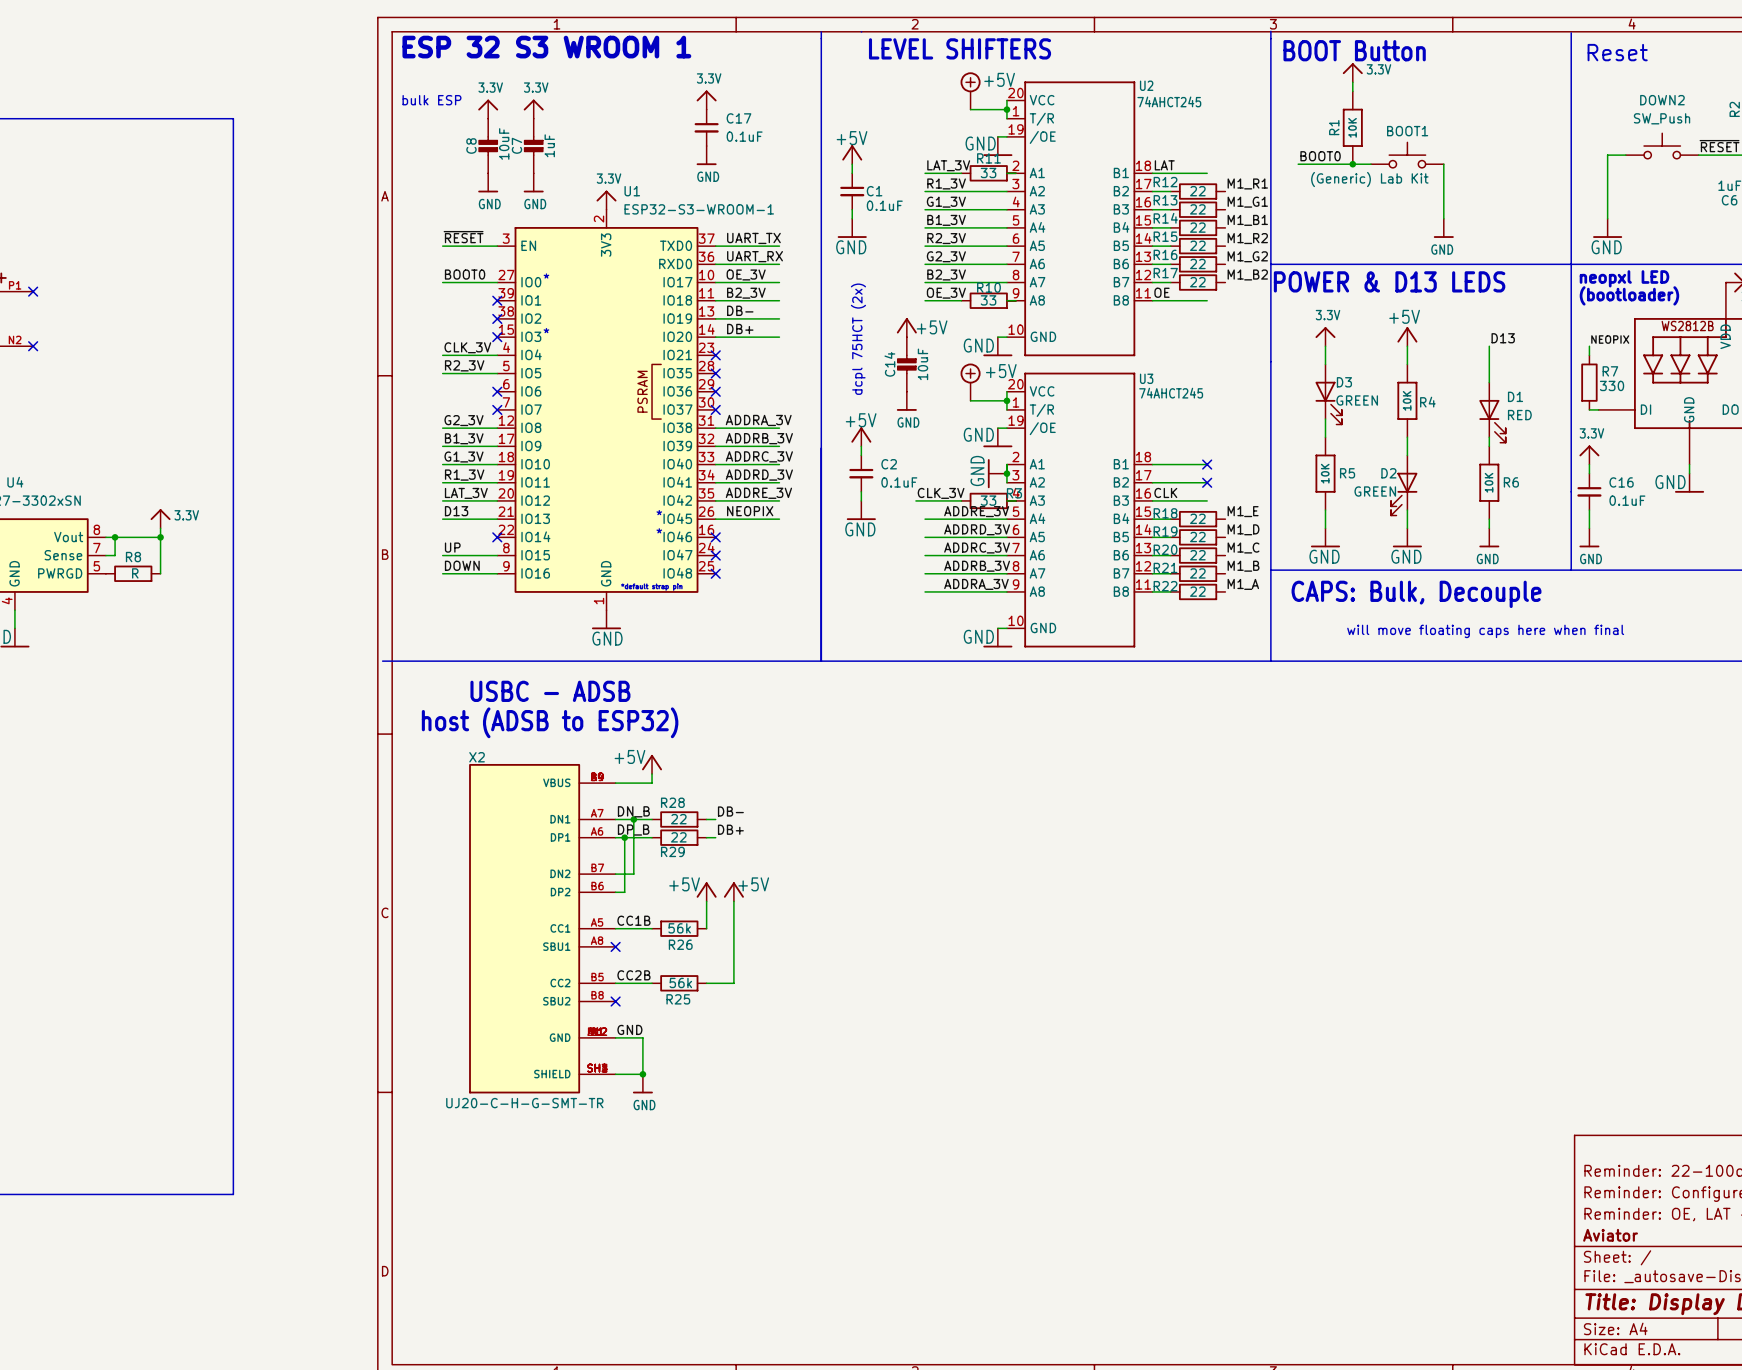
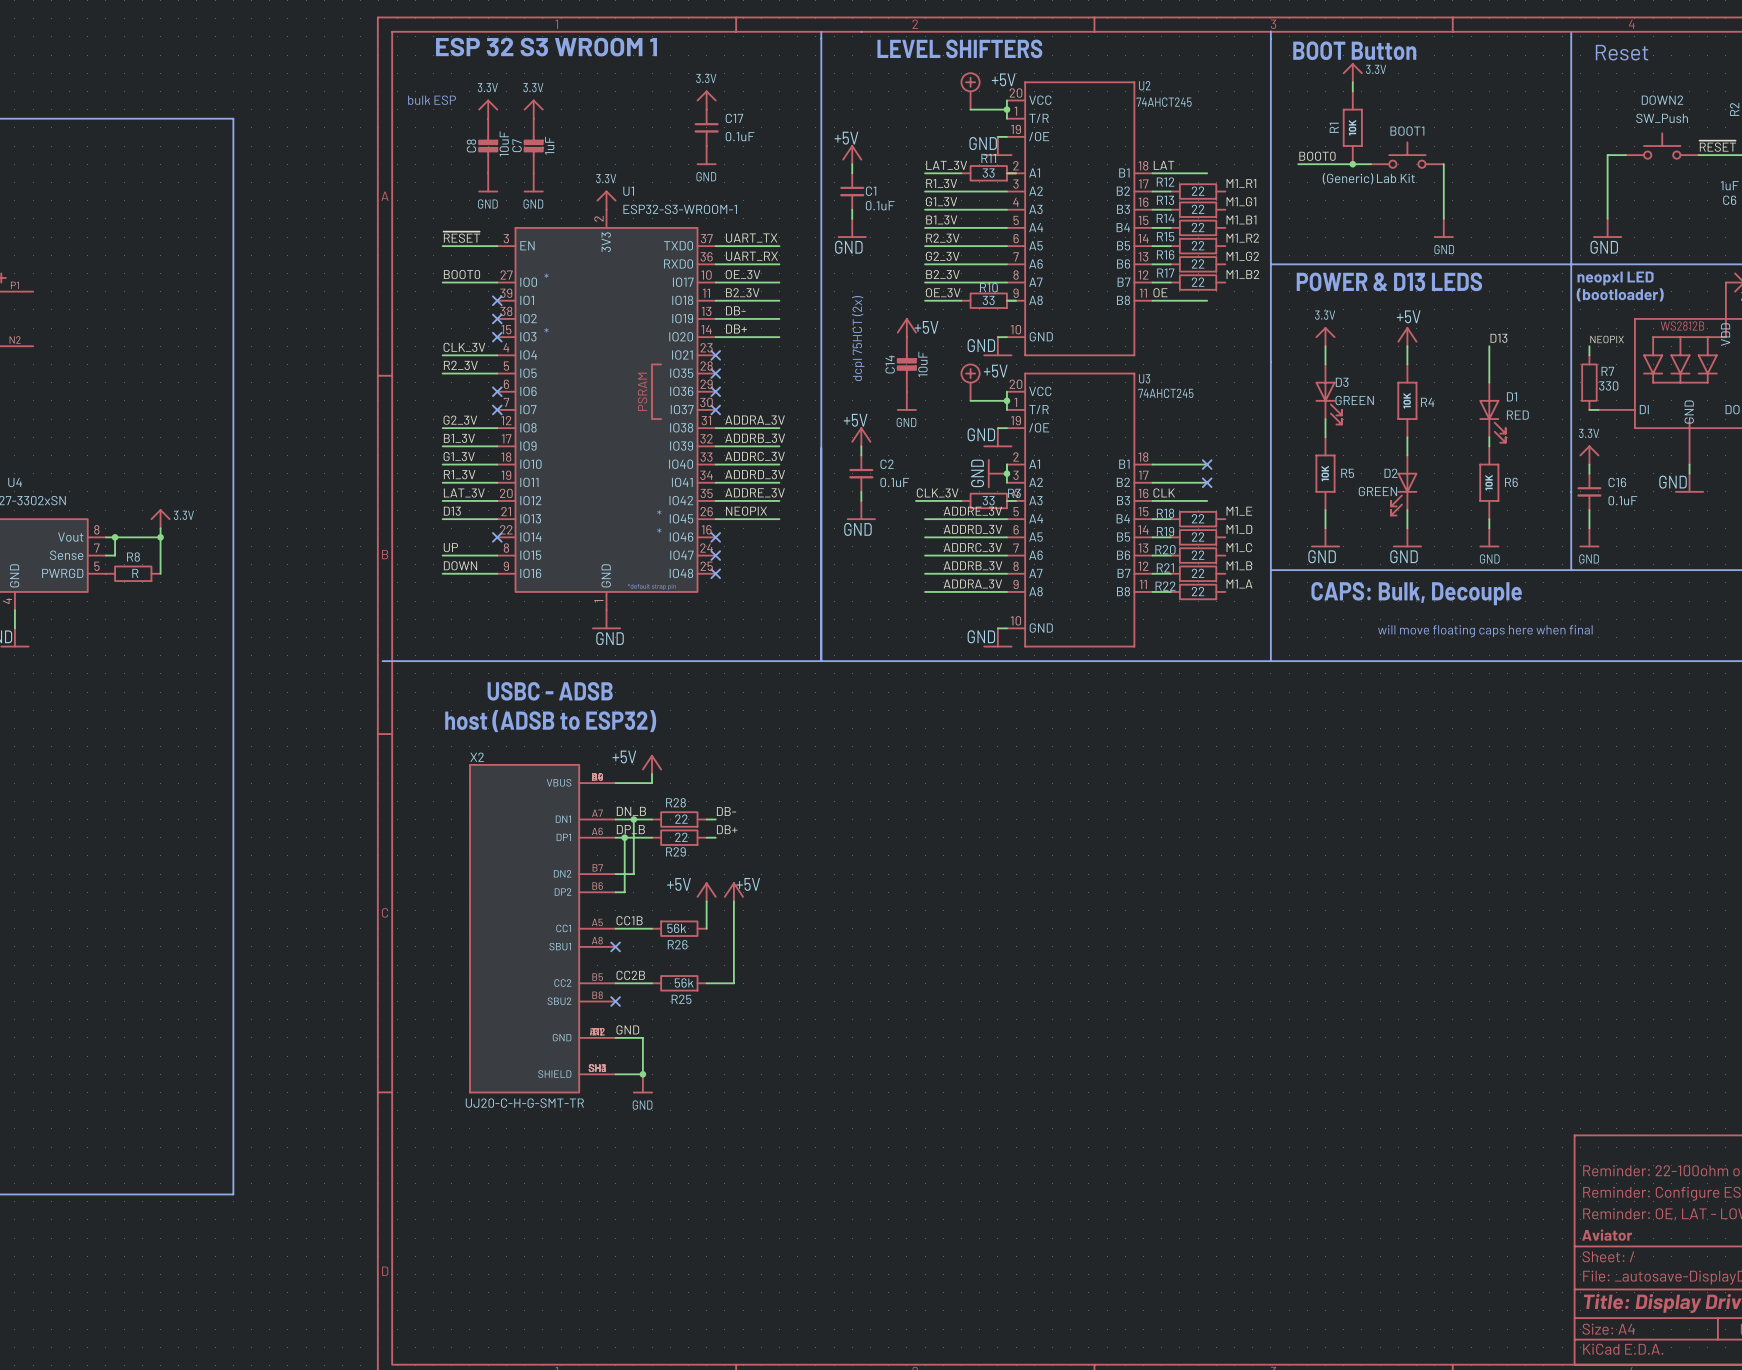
no-connect mark: (33, 291) -> none
no-connect mark: (33, 346) -> none

